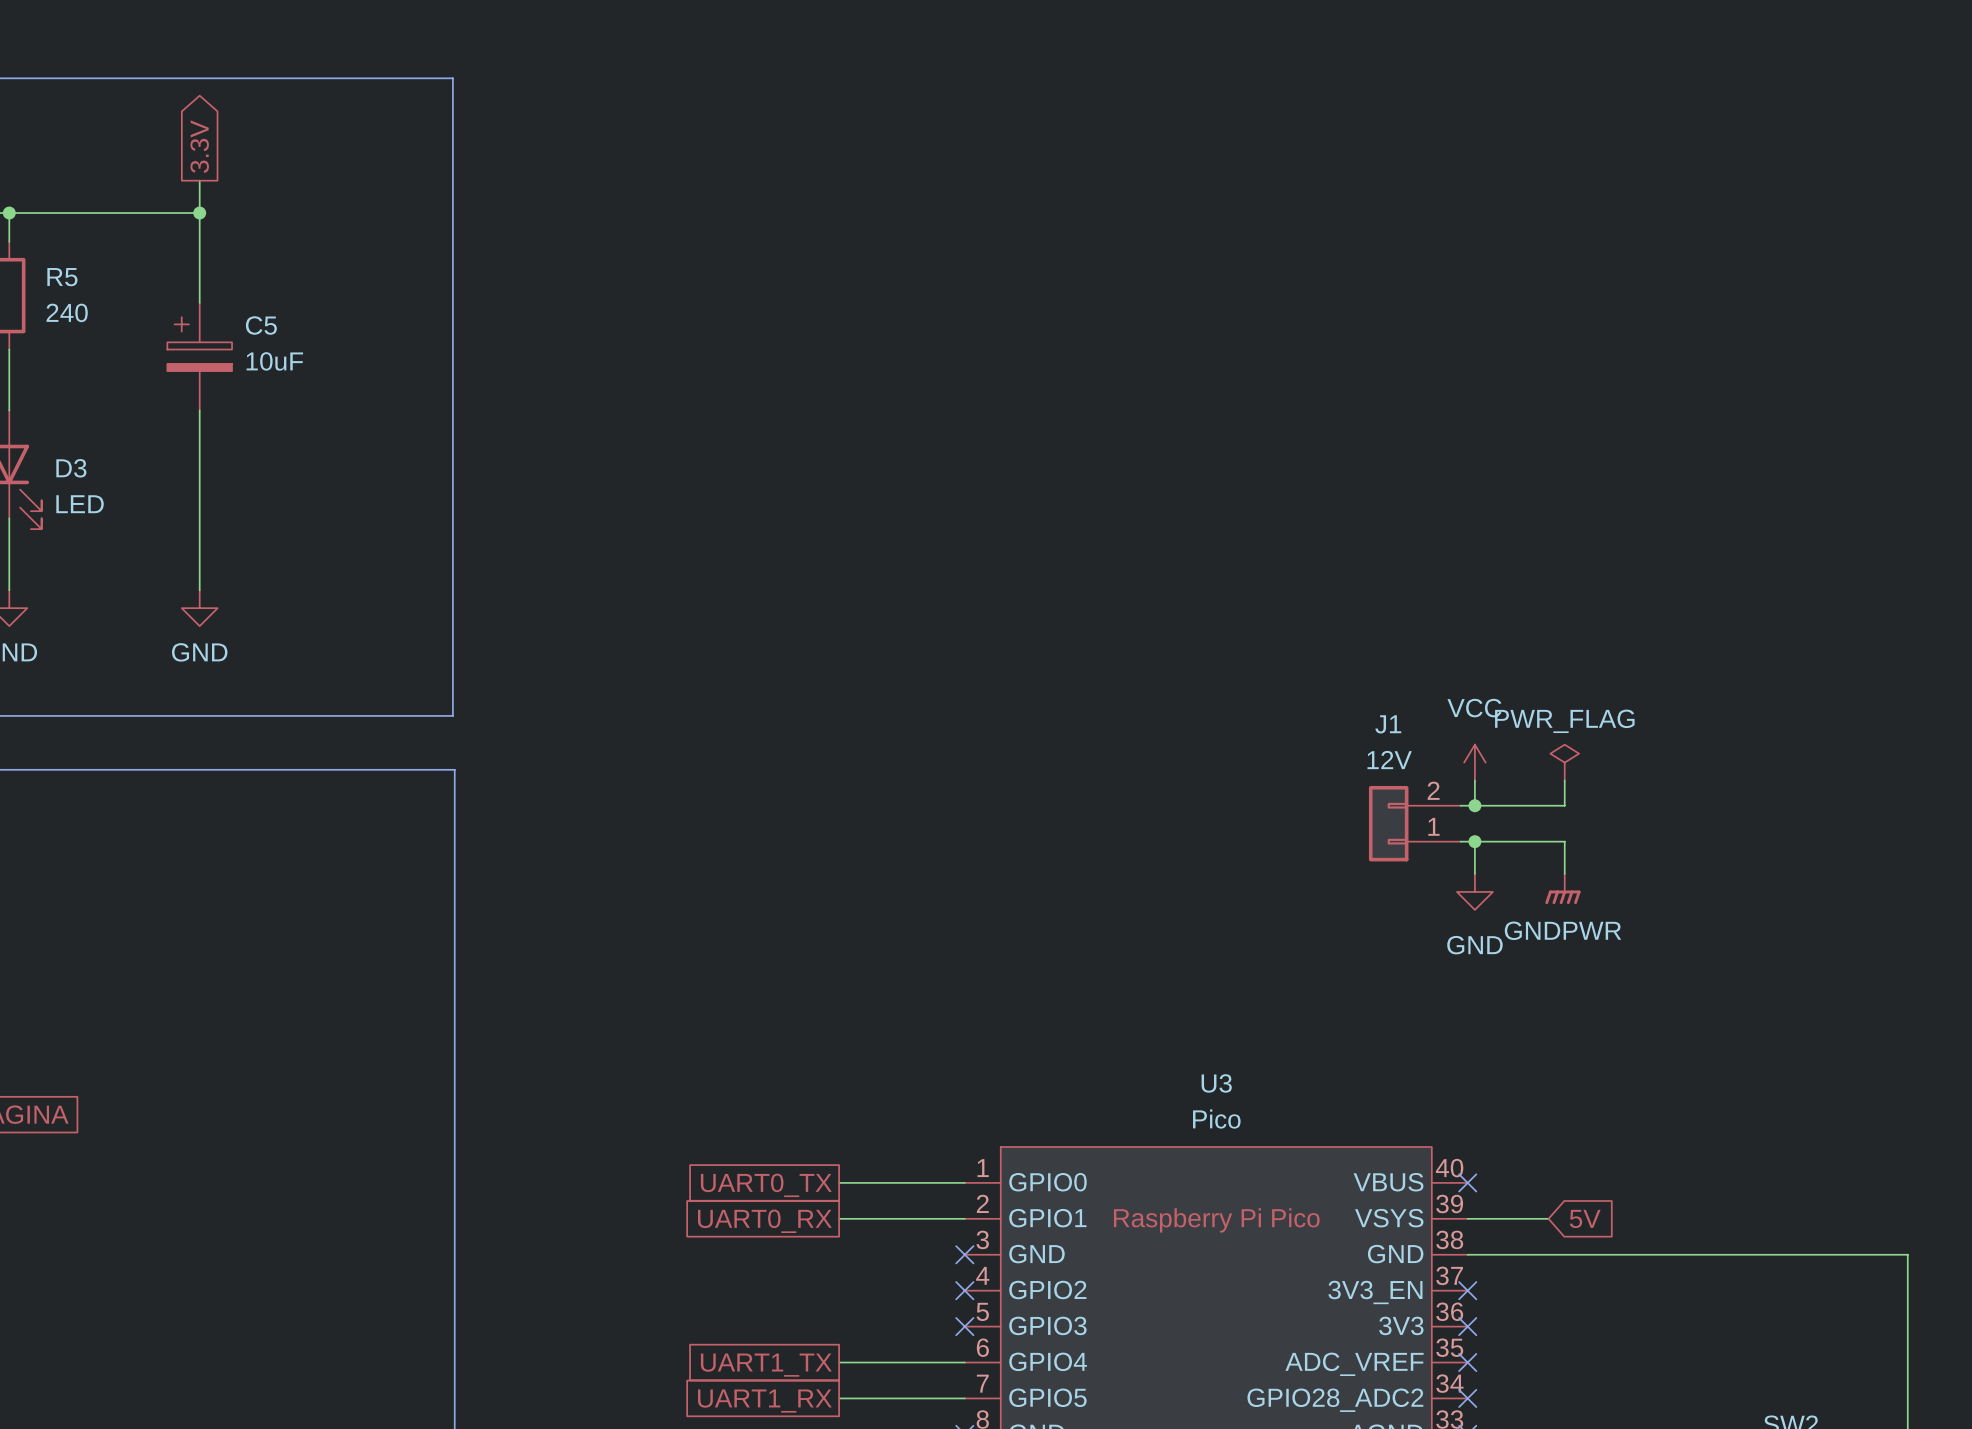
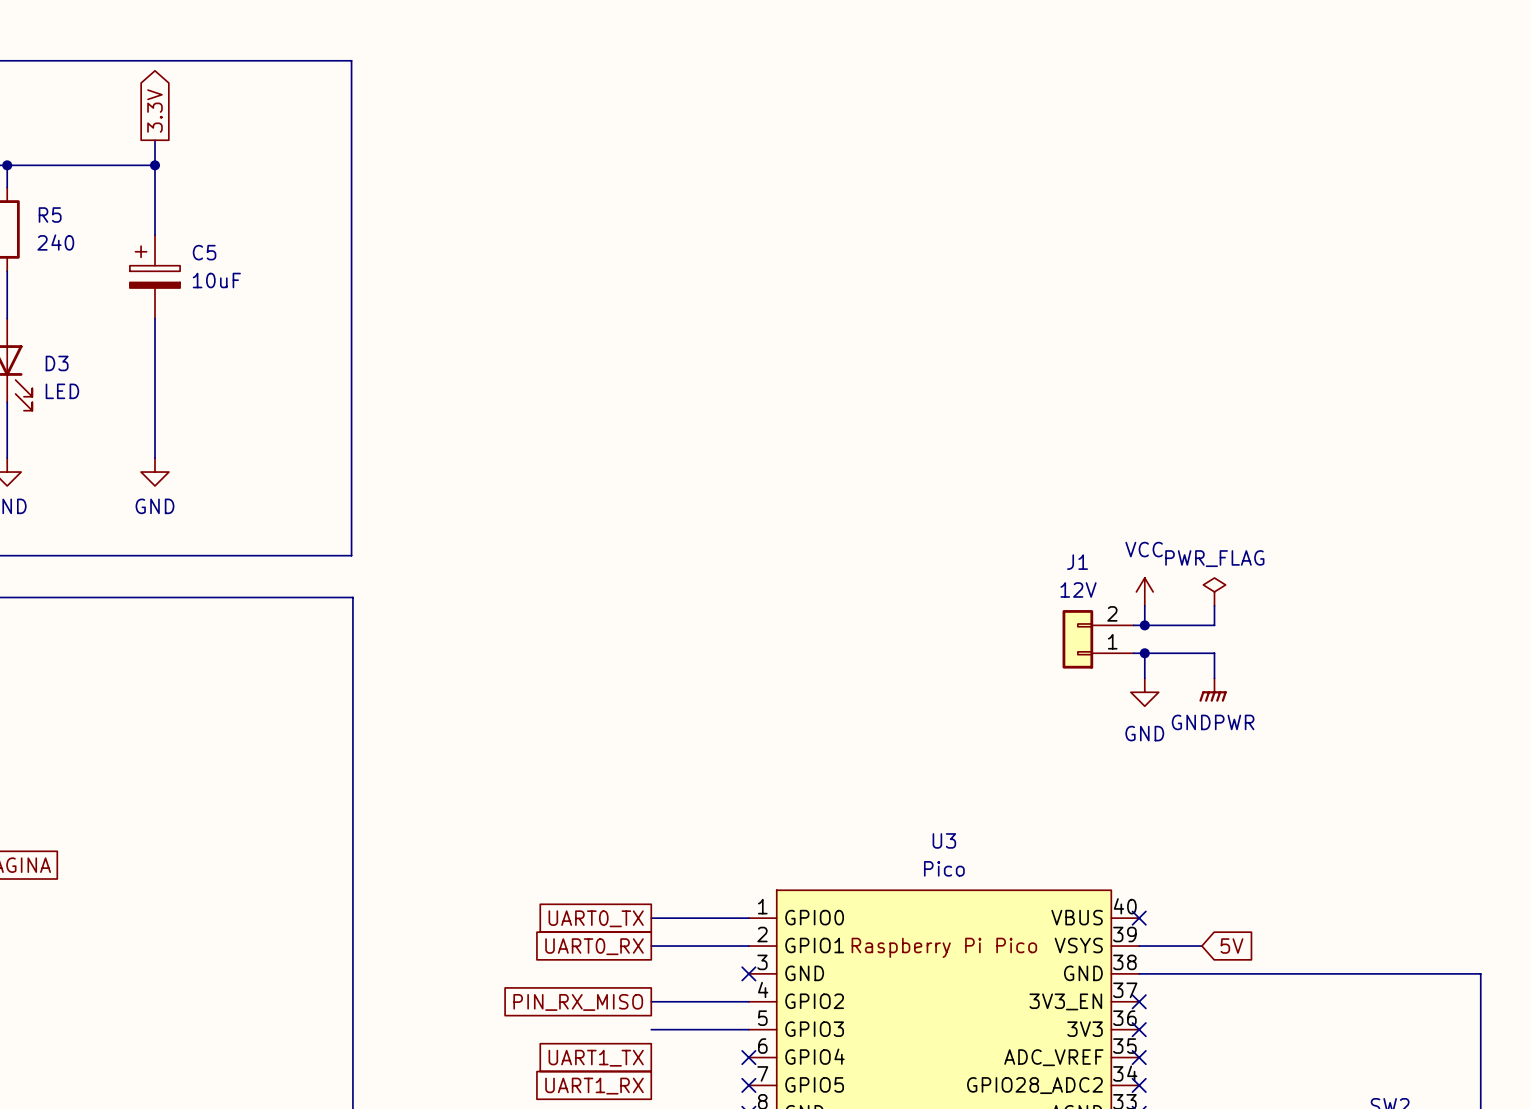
no-connect mark: (964, 1290) -> none
global label: none -> PIN_RX_MISO (578, 1002)
no-connect mark: (964, 1326) -> none
wire: (839, 1362) (964, 1362) -> (651, 1001) (748, 1001)
no-connect mark: none -> (748, 1057)
wire: (839, 1398) (964, 1398) -> (651, 1029) (748, 1029)
no-connect mark: none -> (748, 1085)

